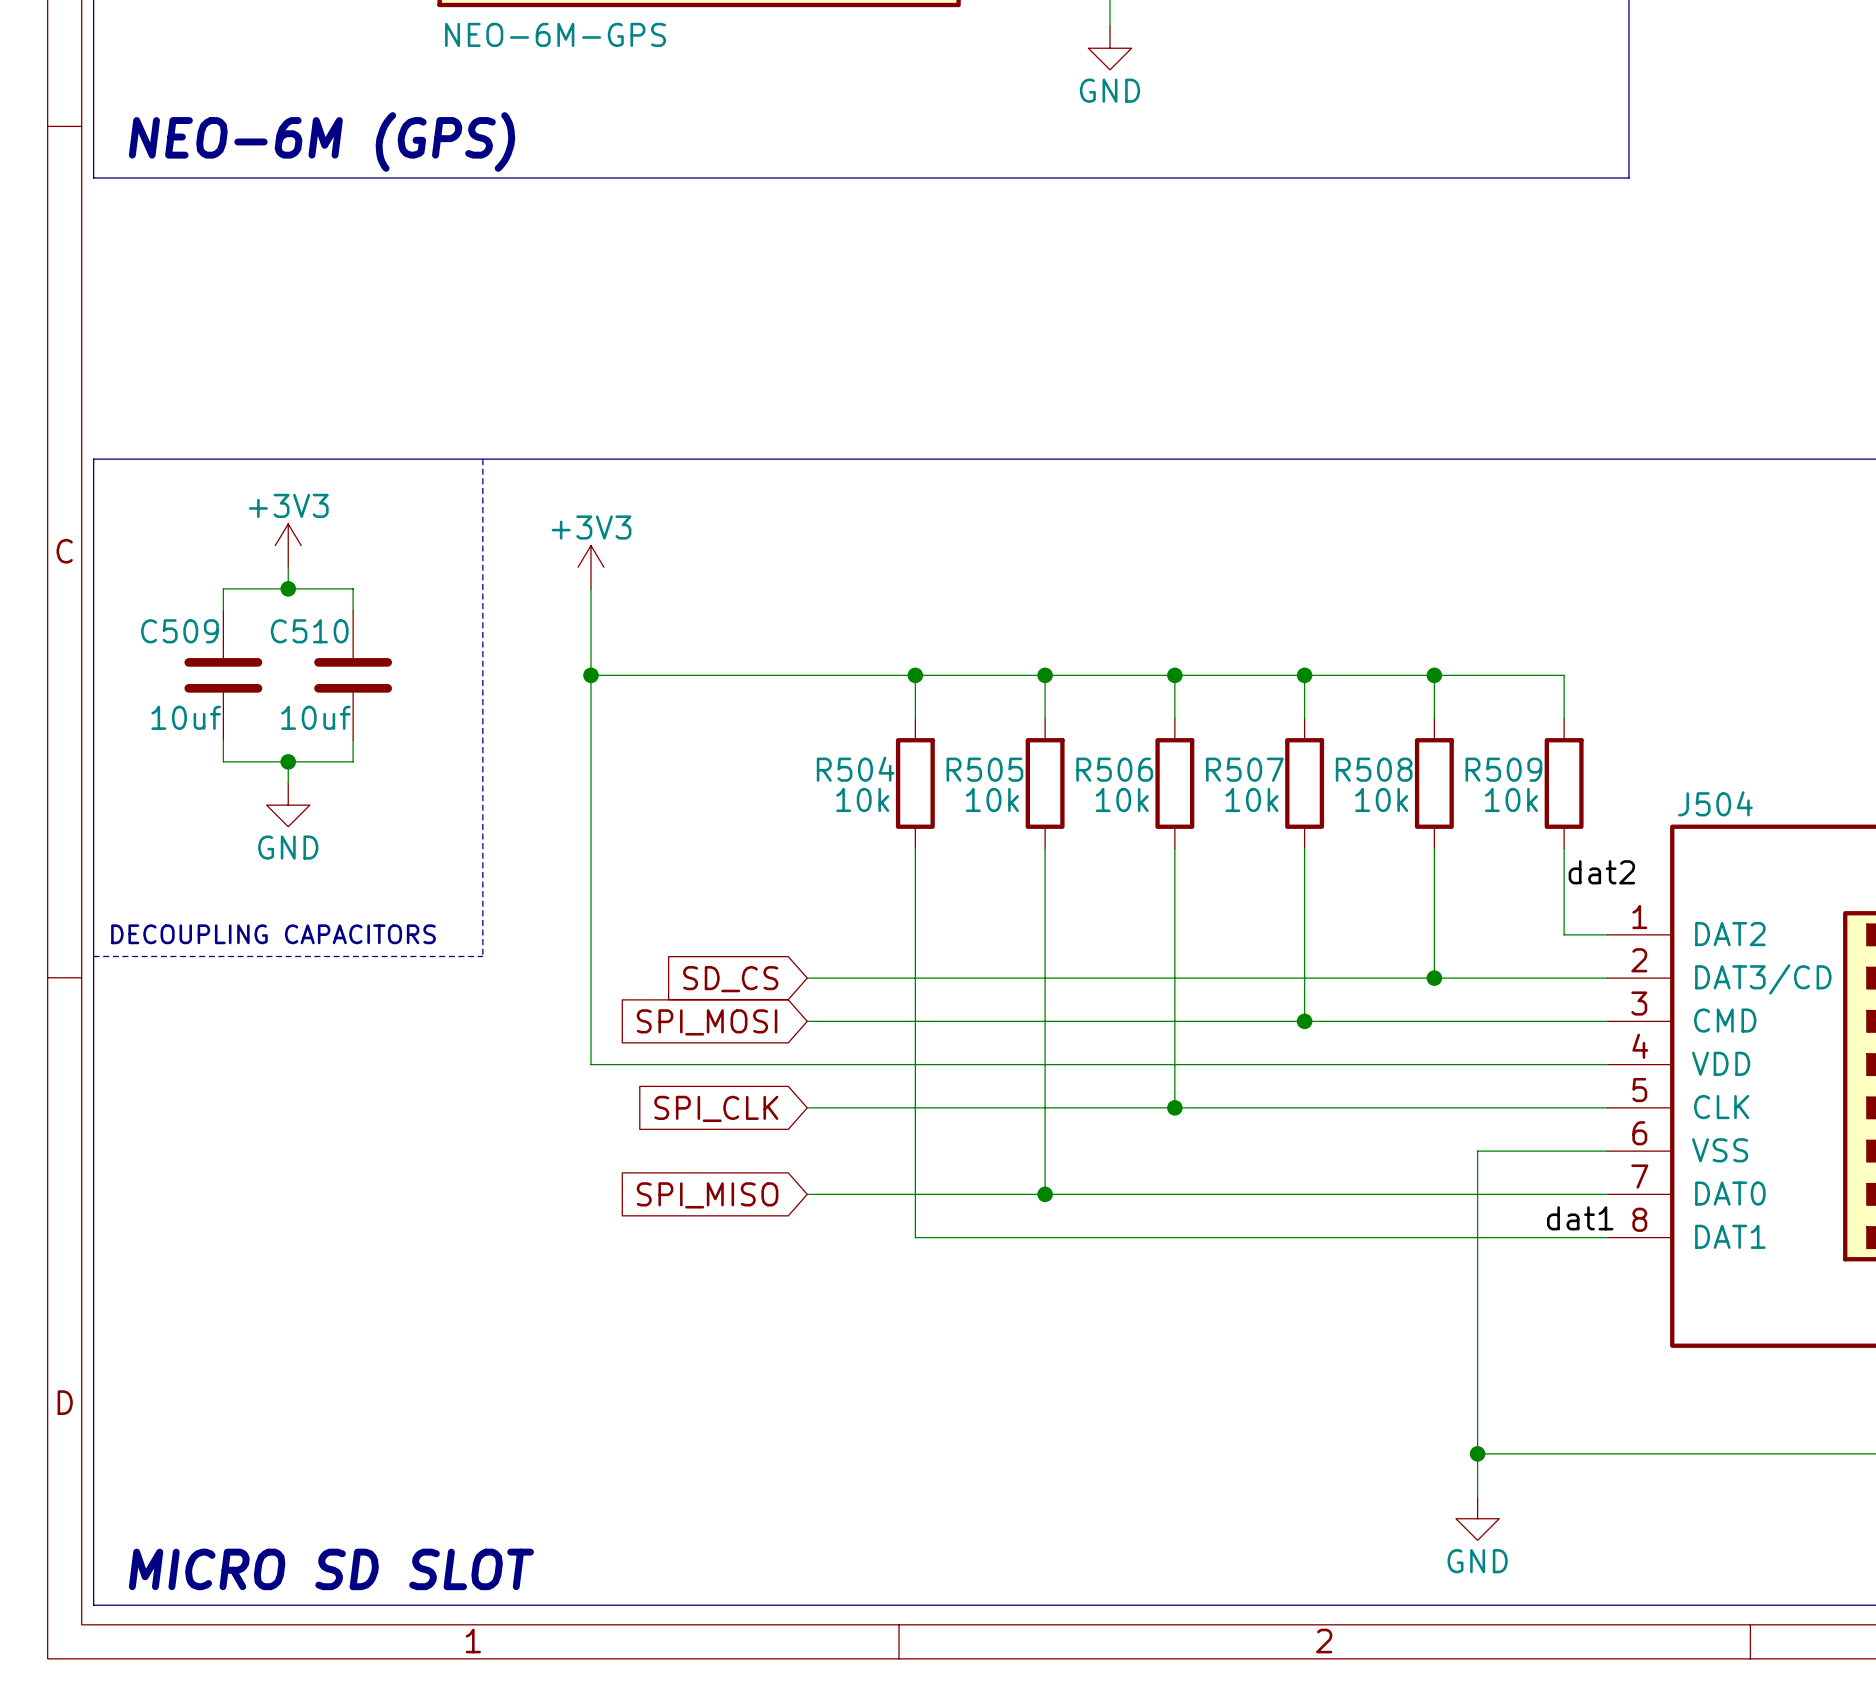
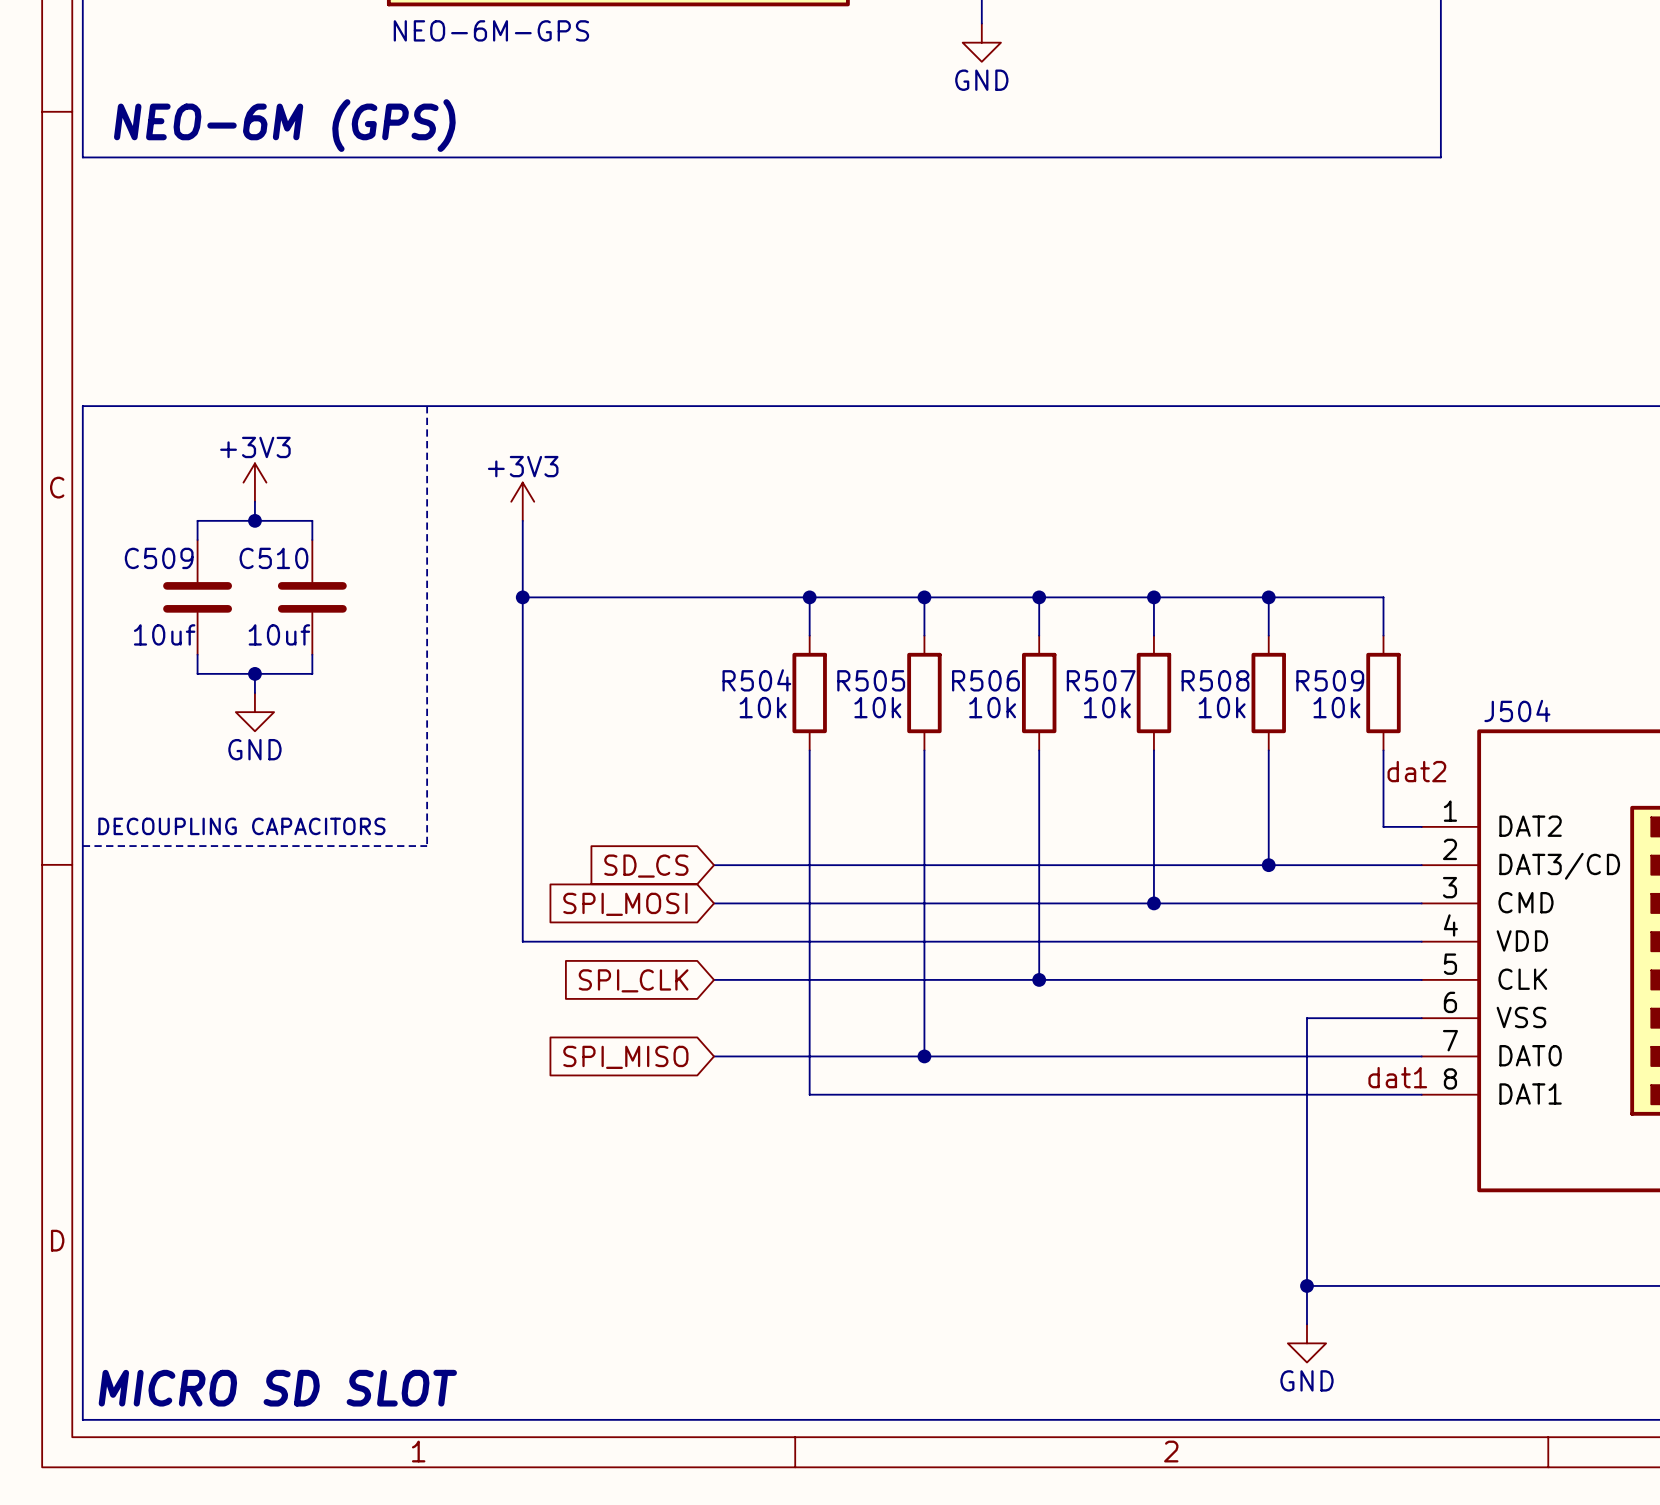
text position: MICRO SD SLOT (331, 1569) -> MICRO SD SLOT (277, 1388)

